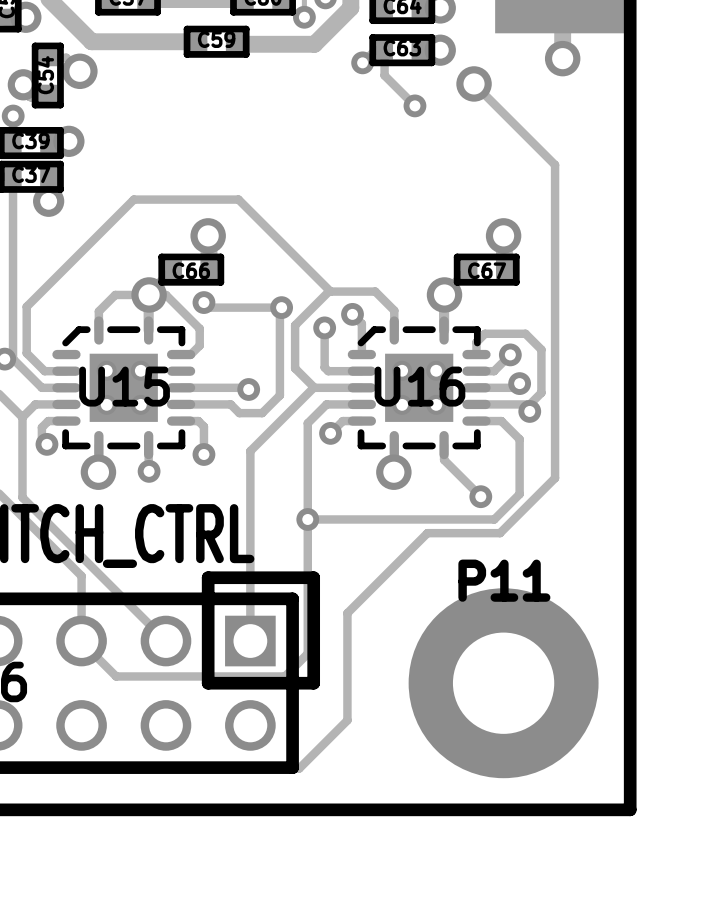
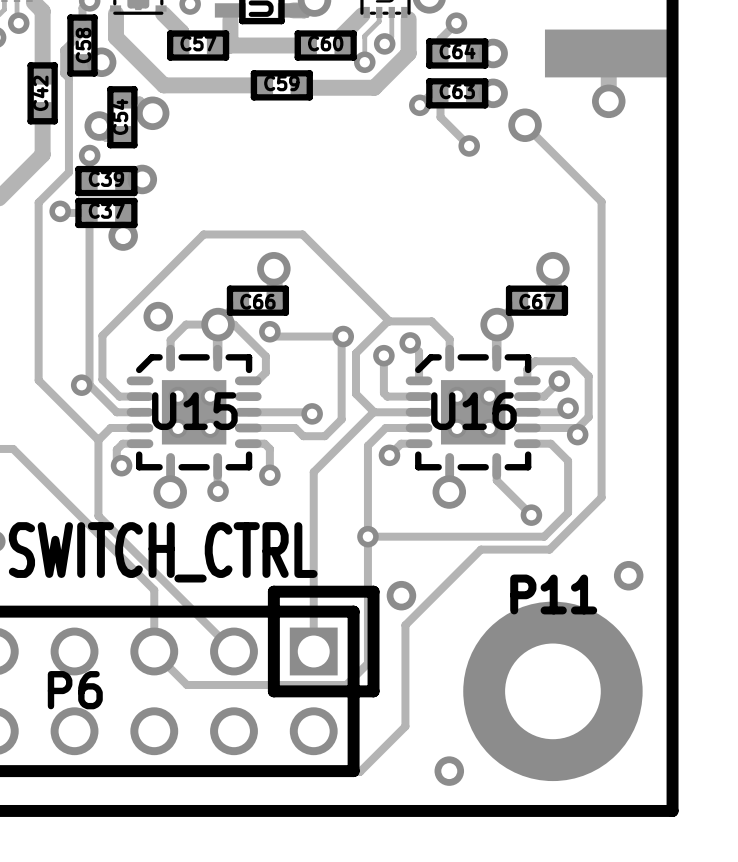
via: none -> (158, 316)
via: none -> (628, 575)
via: none -> (401, 595)
via: none -> (449, 771)

